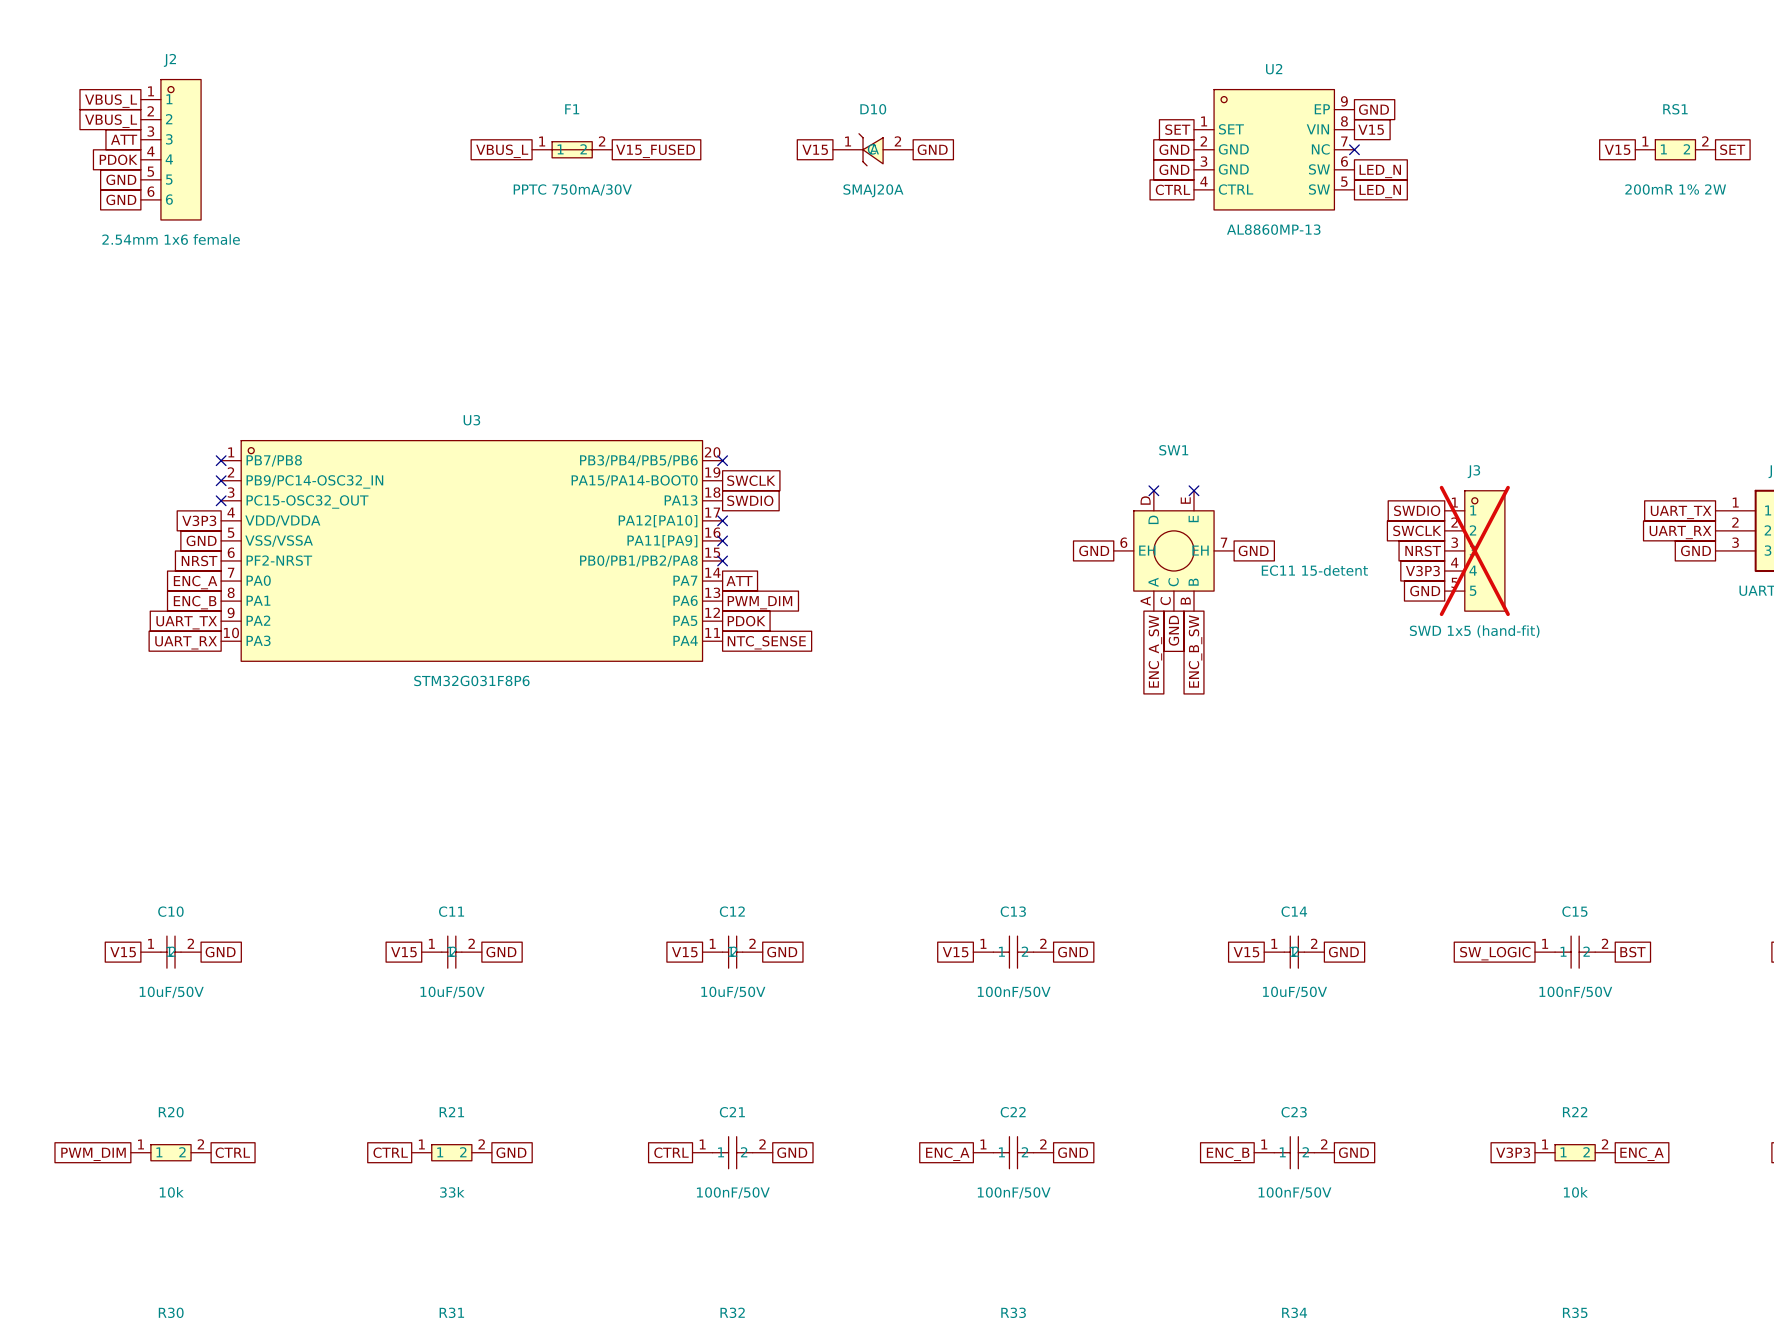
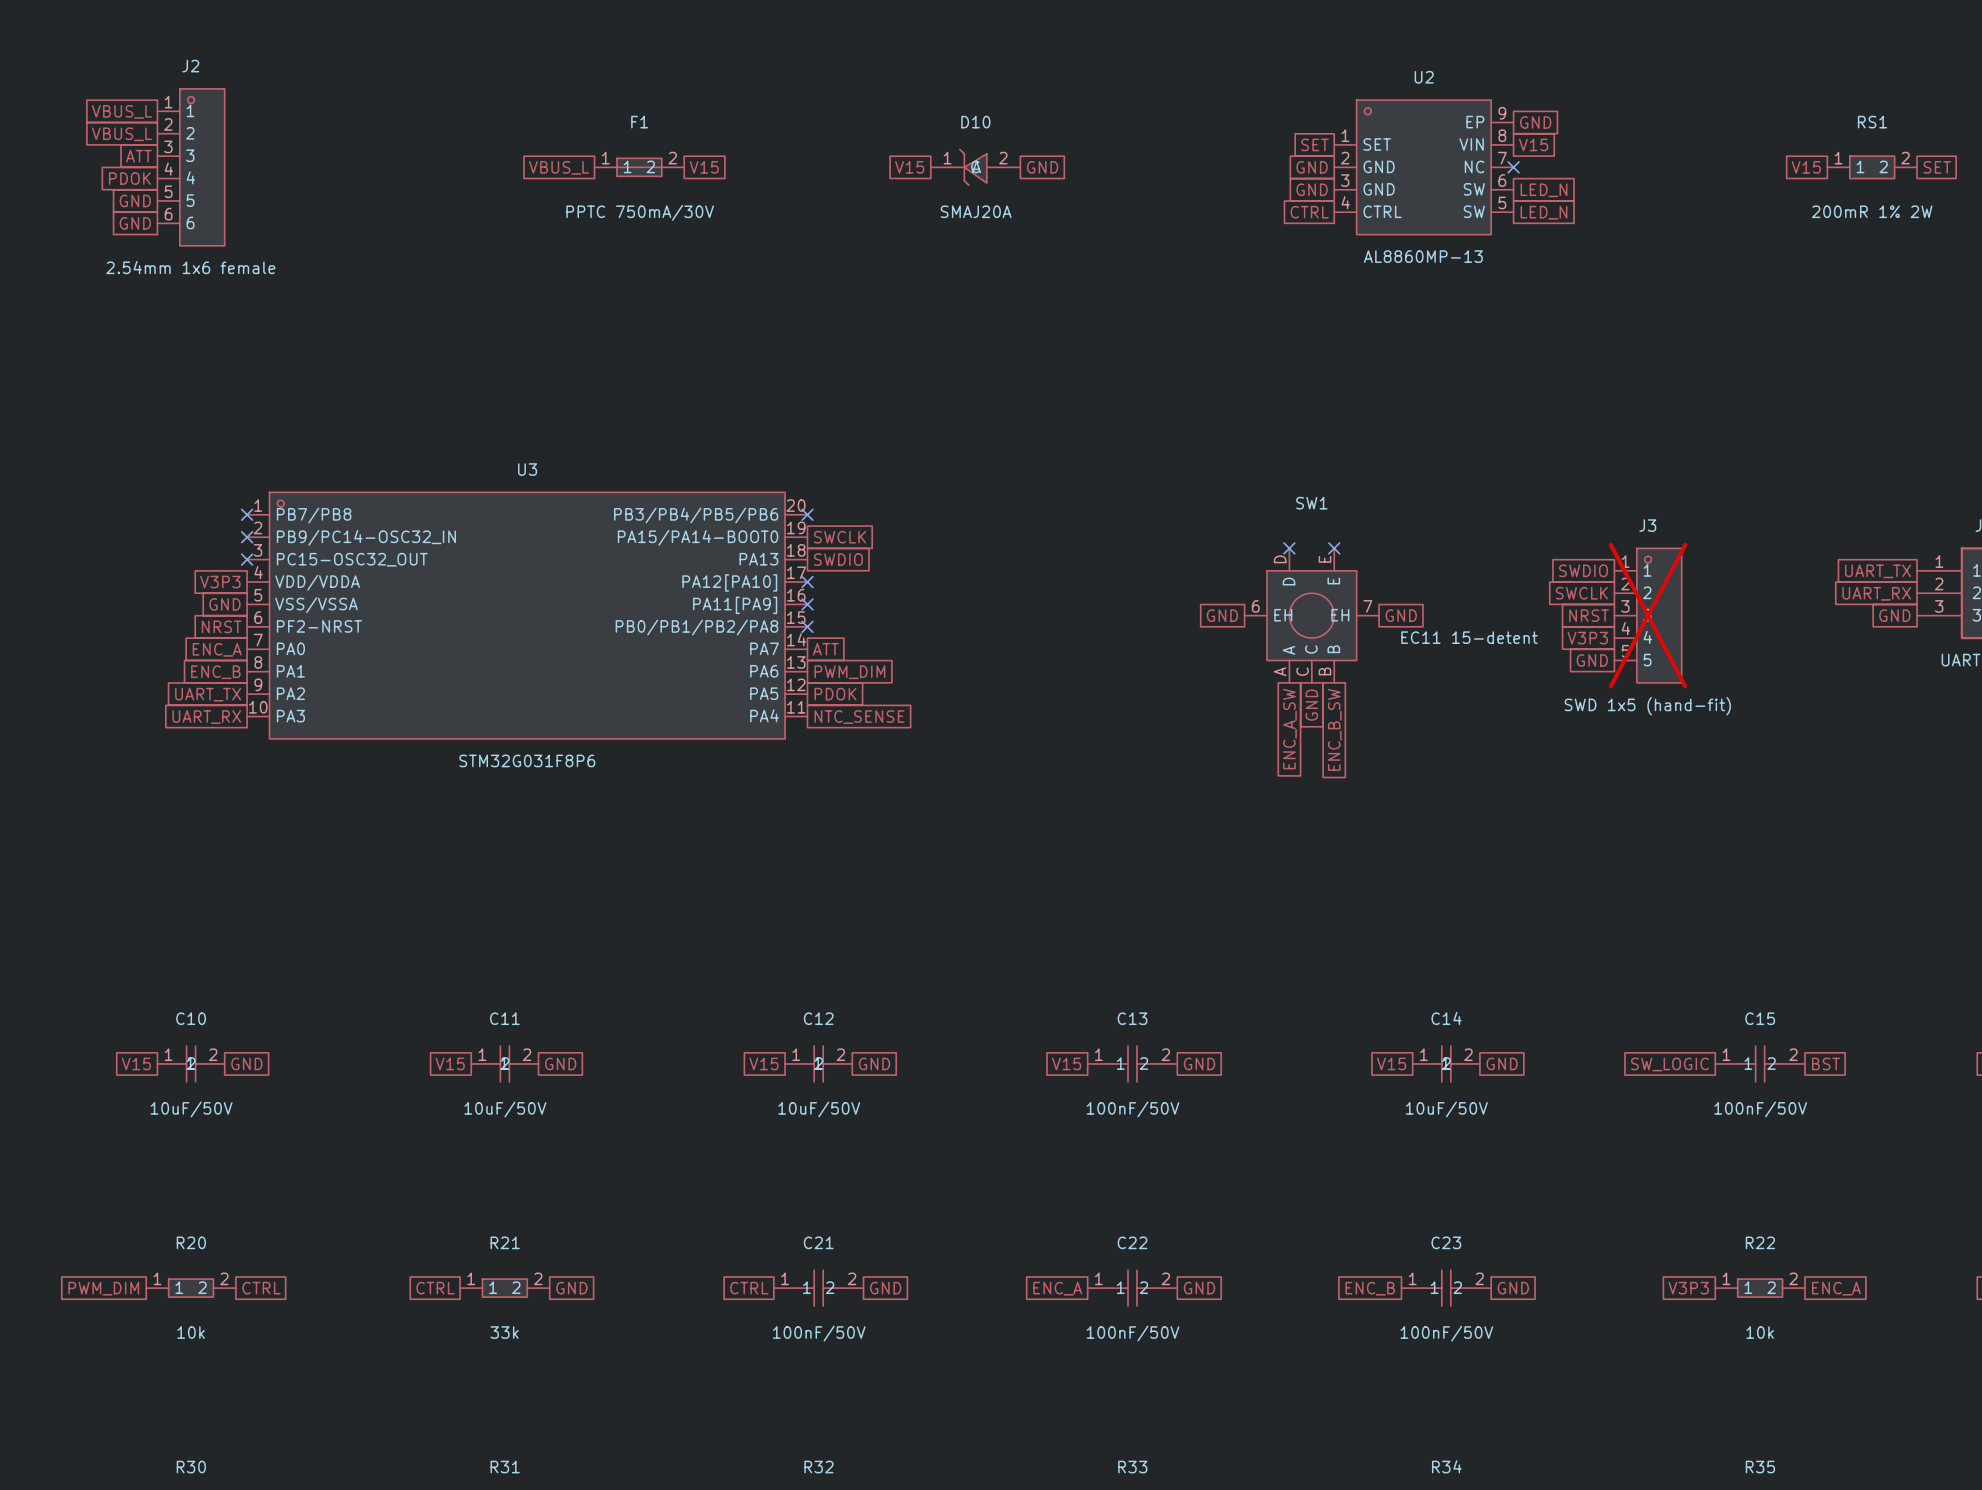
global label: V15_FUSED (655, 151) -> V15 (704, 167)

